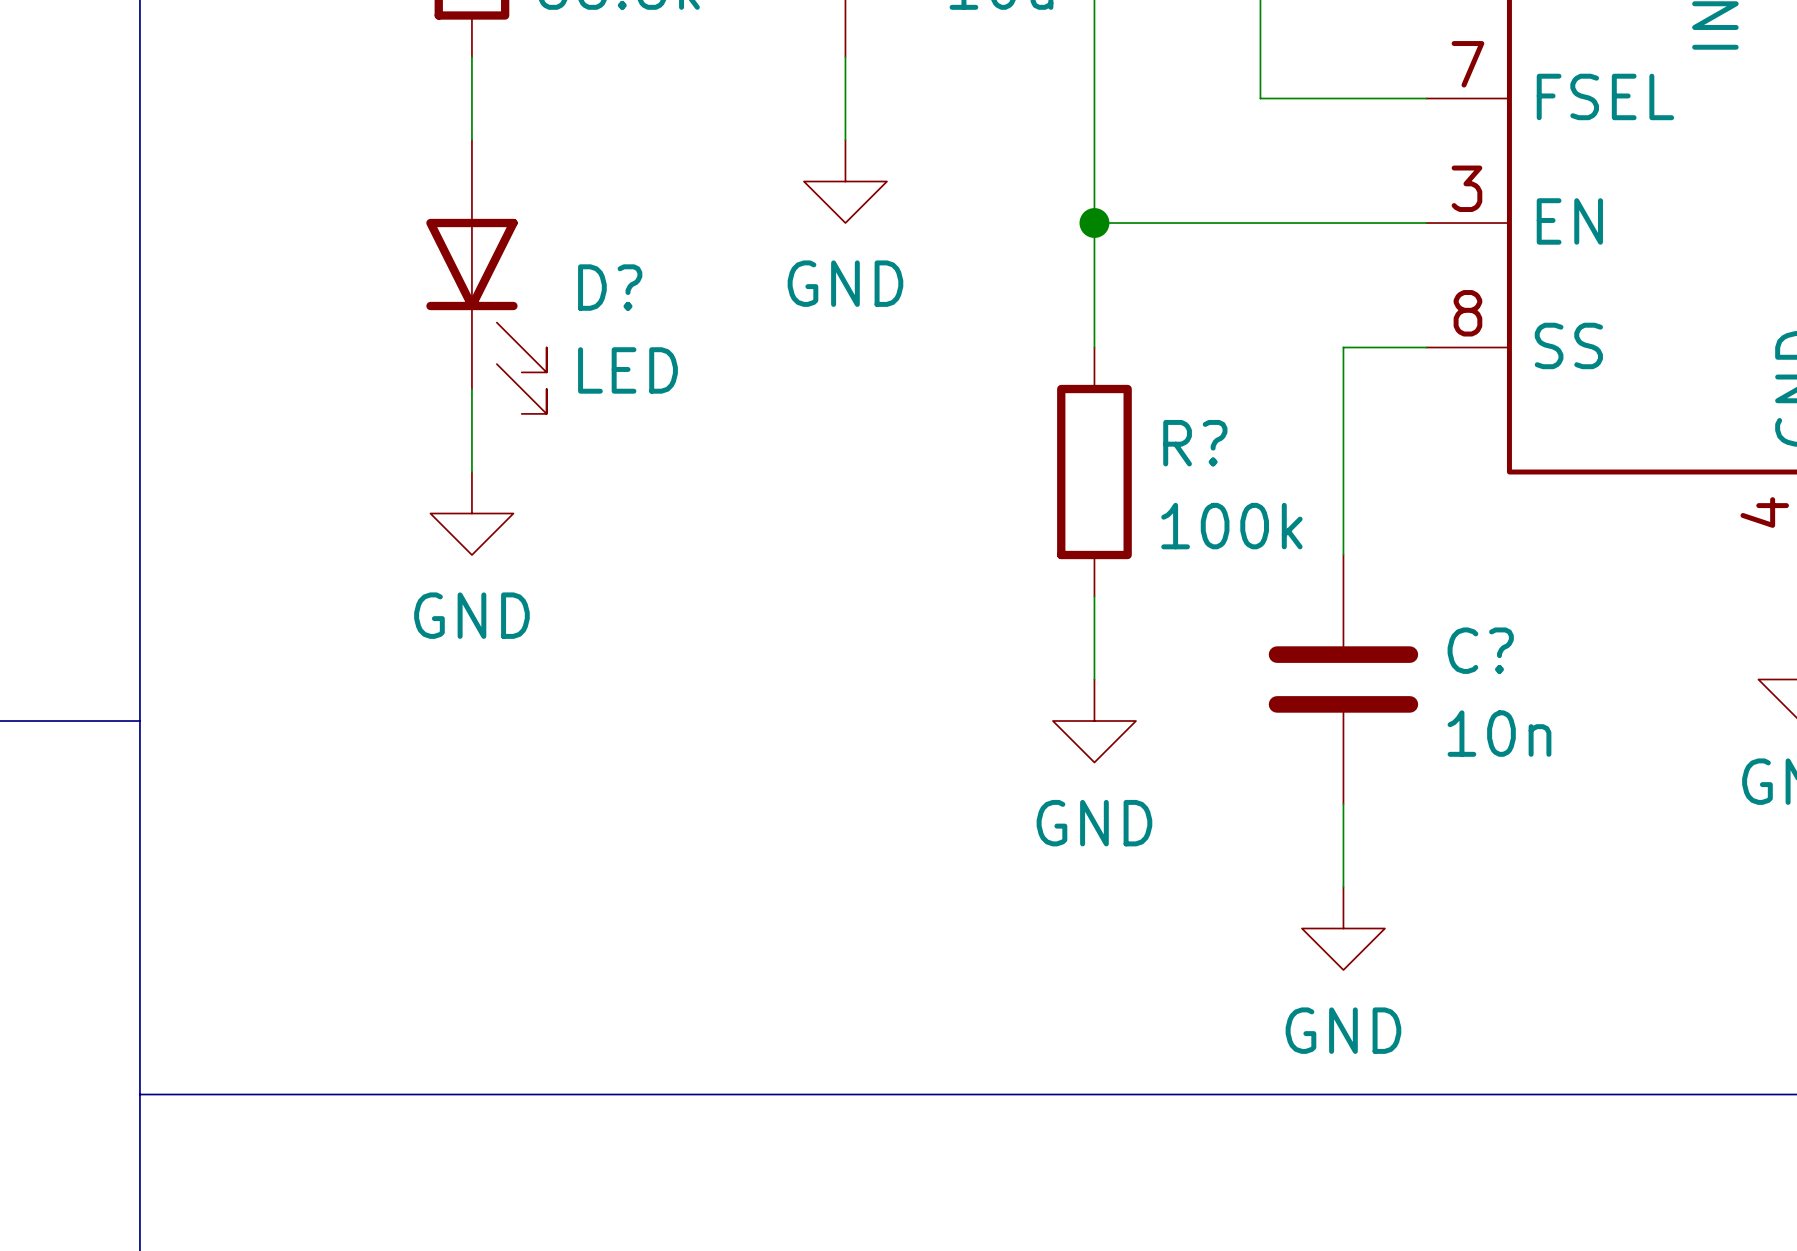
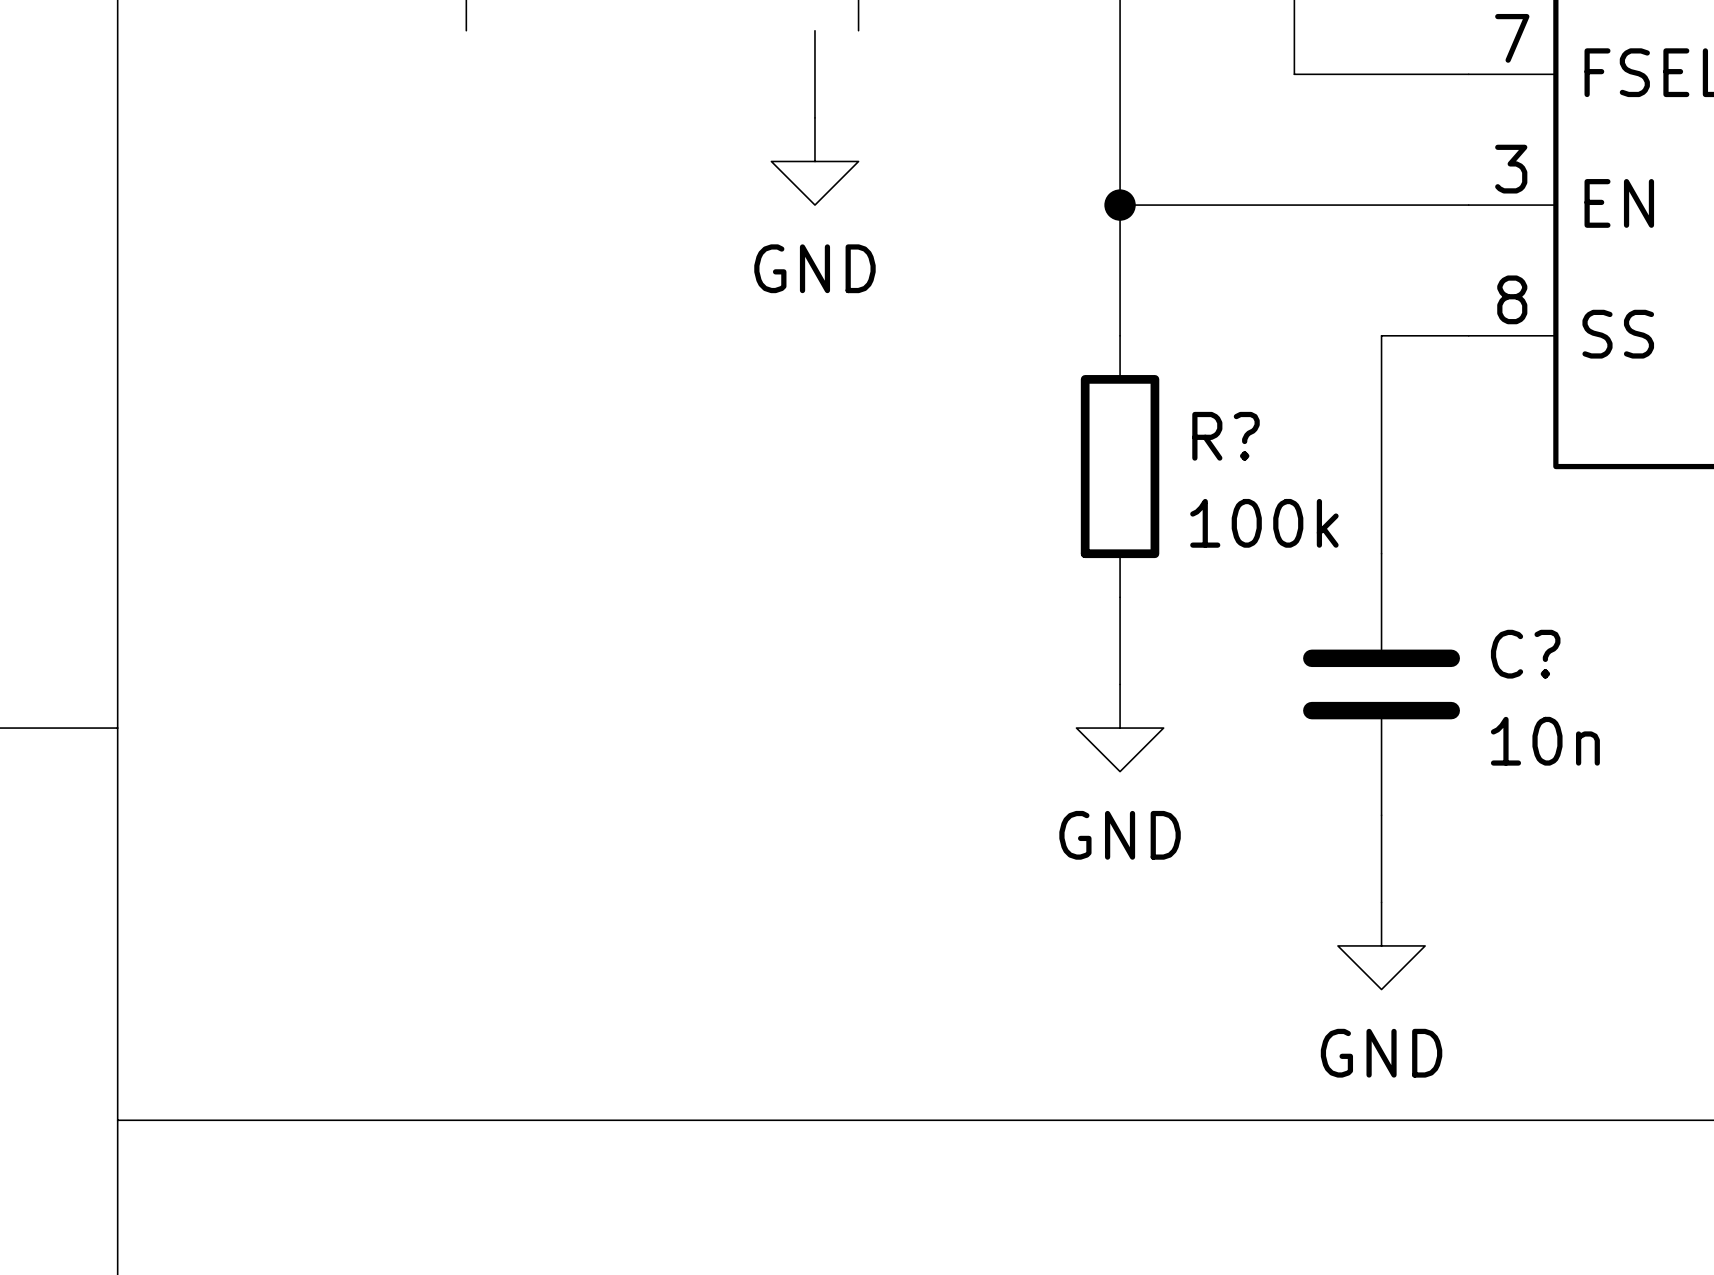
wire: (471, 57) (471, 140) -> none
wire: (845, 57) (845, 140) -> (814, 30) (814, 117)
power symbol position: GND (845, 181) -> GND (814, 161)
D?: LED (486, 276) -> none
wire: (471, 389) (471, 472) -> none
power symbol: GND (471, 513) -> none

